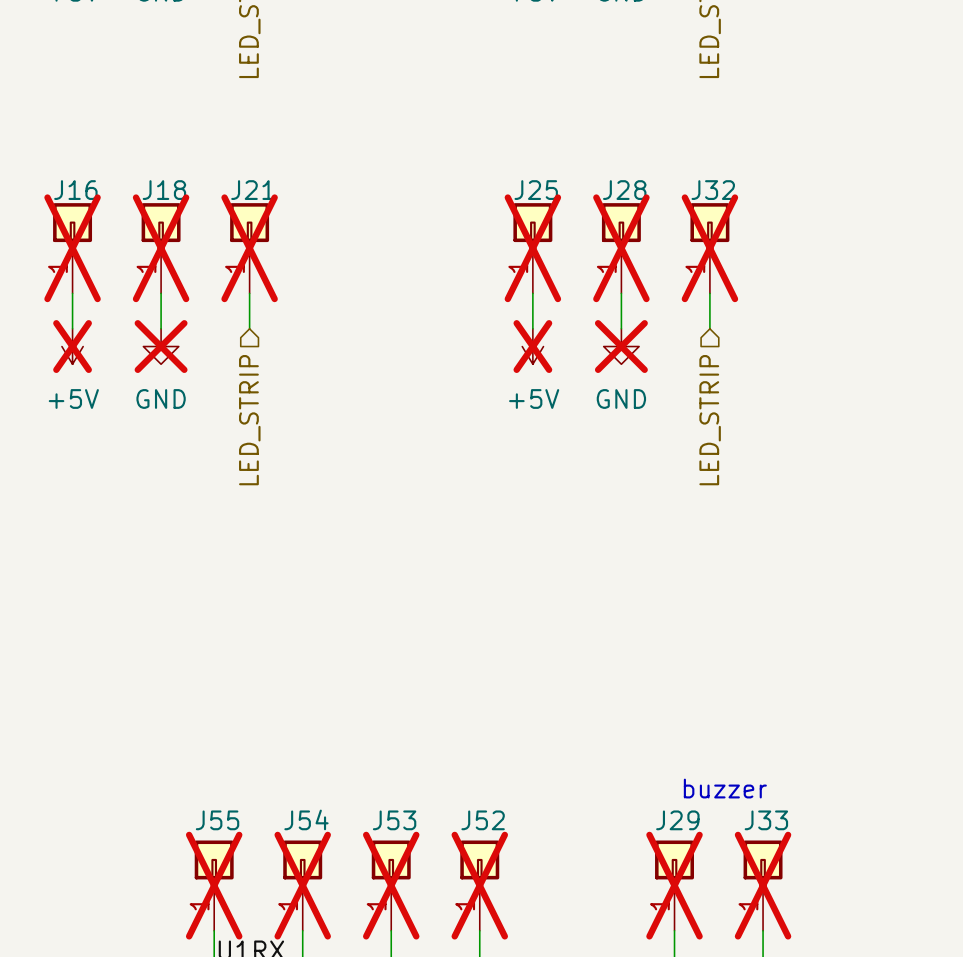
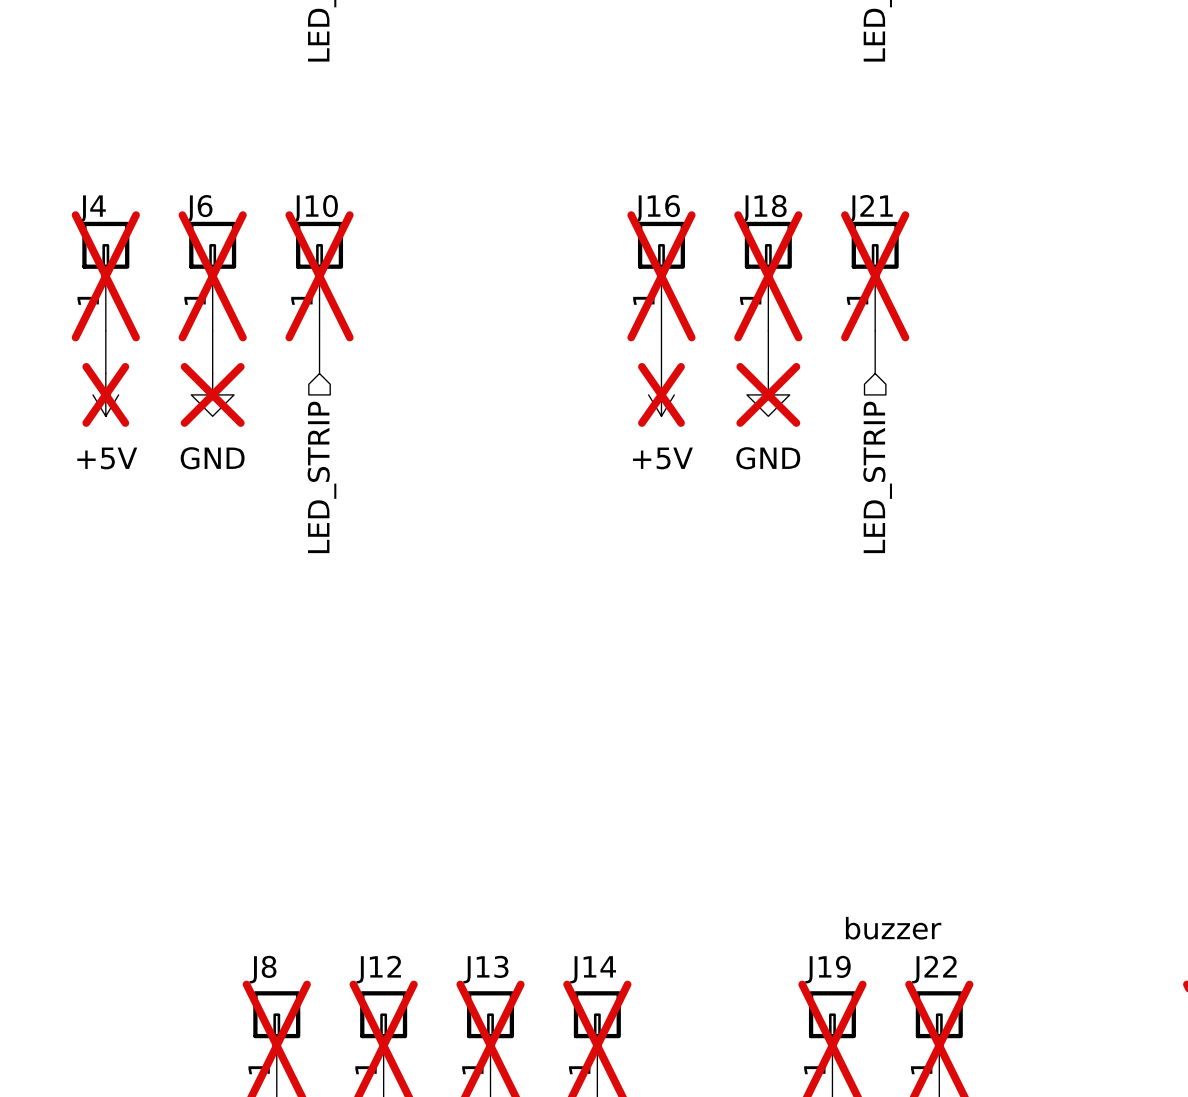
J16 name: J16 (75, 190) -> J4 (92, 208)
J18 name: J18 (164, 190) -> J6 (198, 208)
J21 name: J21 (252, 190) -> J10 (315, 208)
J25 name: J25 (536, 190) -> J16 (657, 208)
J28 name: J28 (624, 190) -> J18 (763, 208)
J32 name: J32 (713, 190) -> J21 (870, 208)
J54 name: J54 (306, 819) -> J12 (378, 969)
J55 name: J55 (217, 820) -> J8 (263, 969)
J53 name: J53 (394, 820) -> J13 (485, 969)
J52 name: J52 (483, 820) -> J14 (593, 969)
J29 name: J29 (677, 820) -> J19 (827, 969)
J33 name: J33 (766, 820) -> J22 (934, 969)

